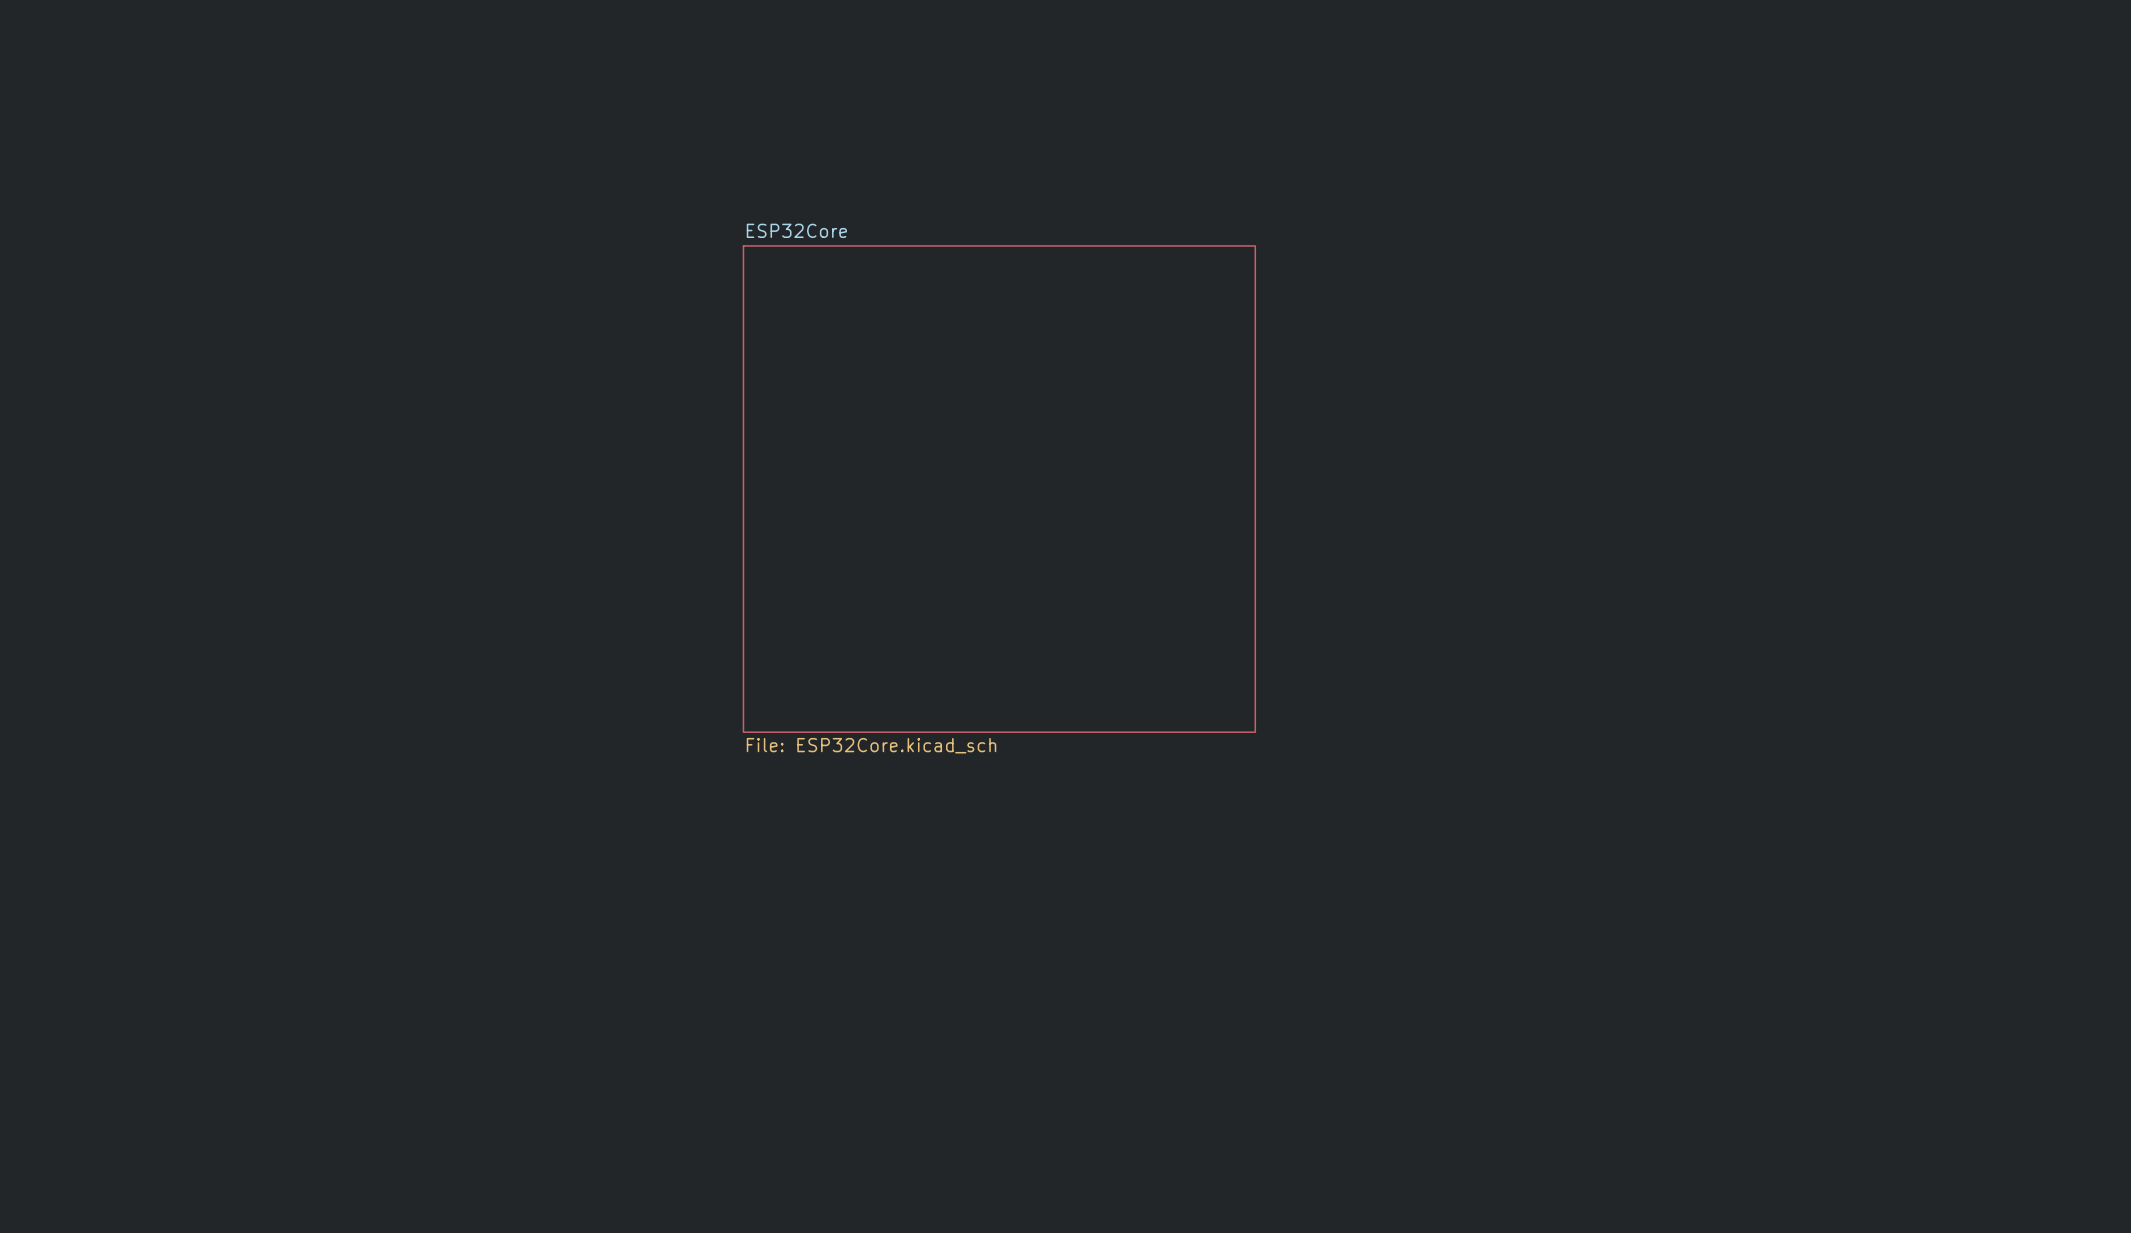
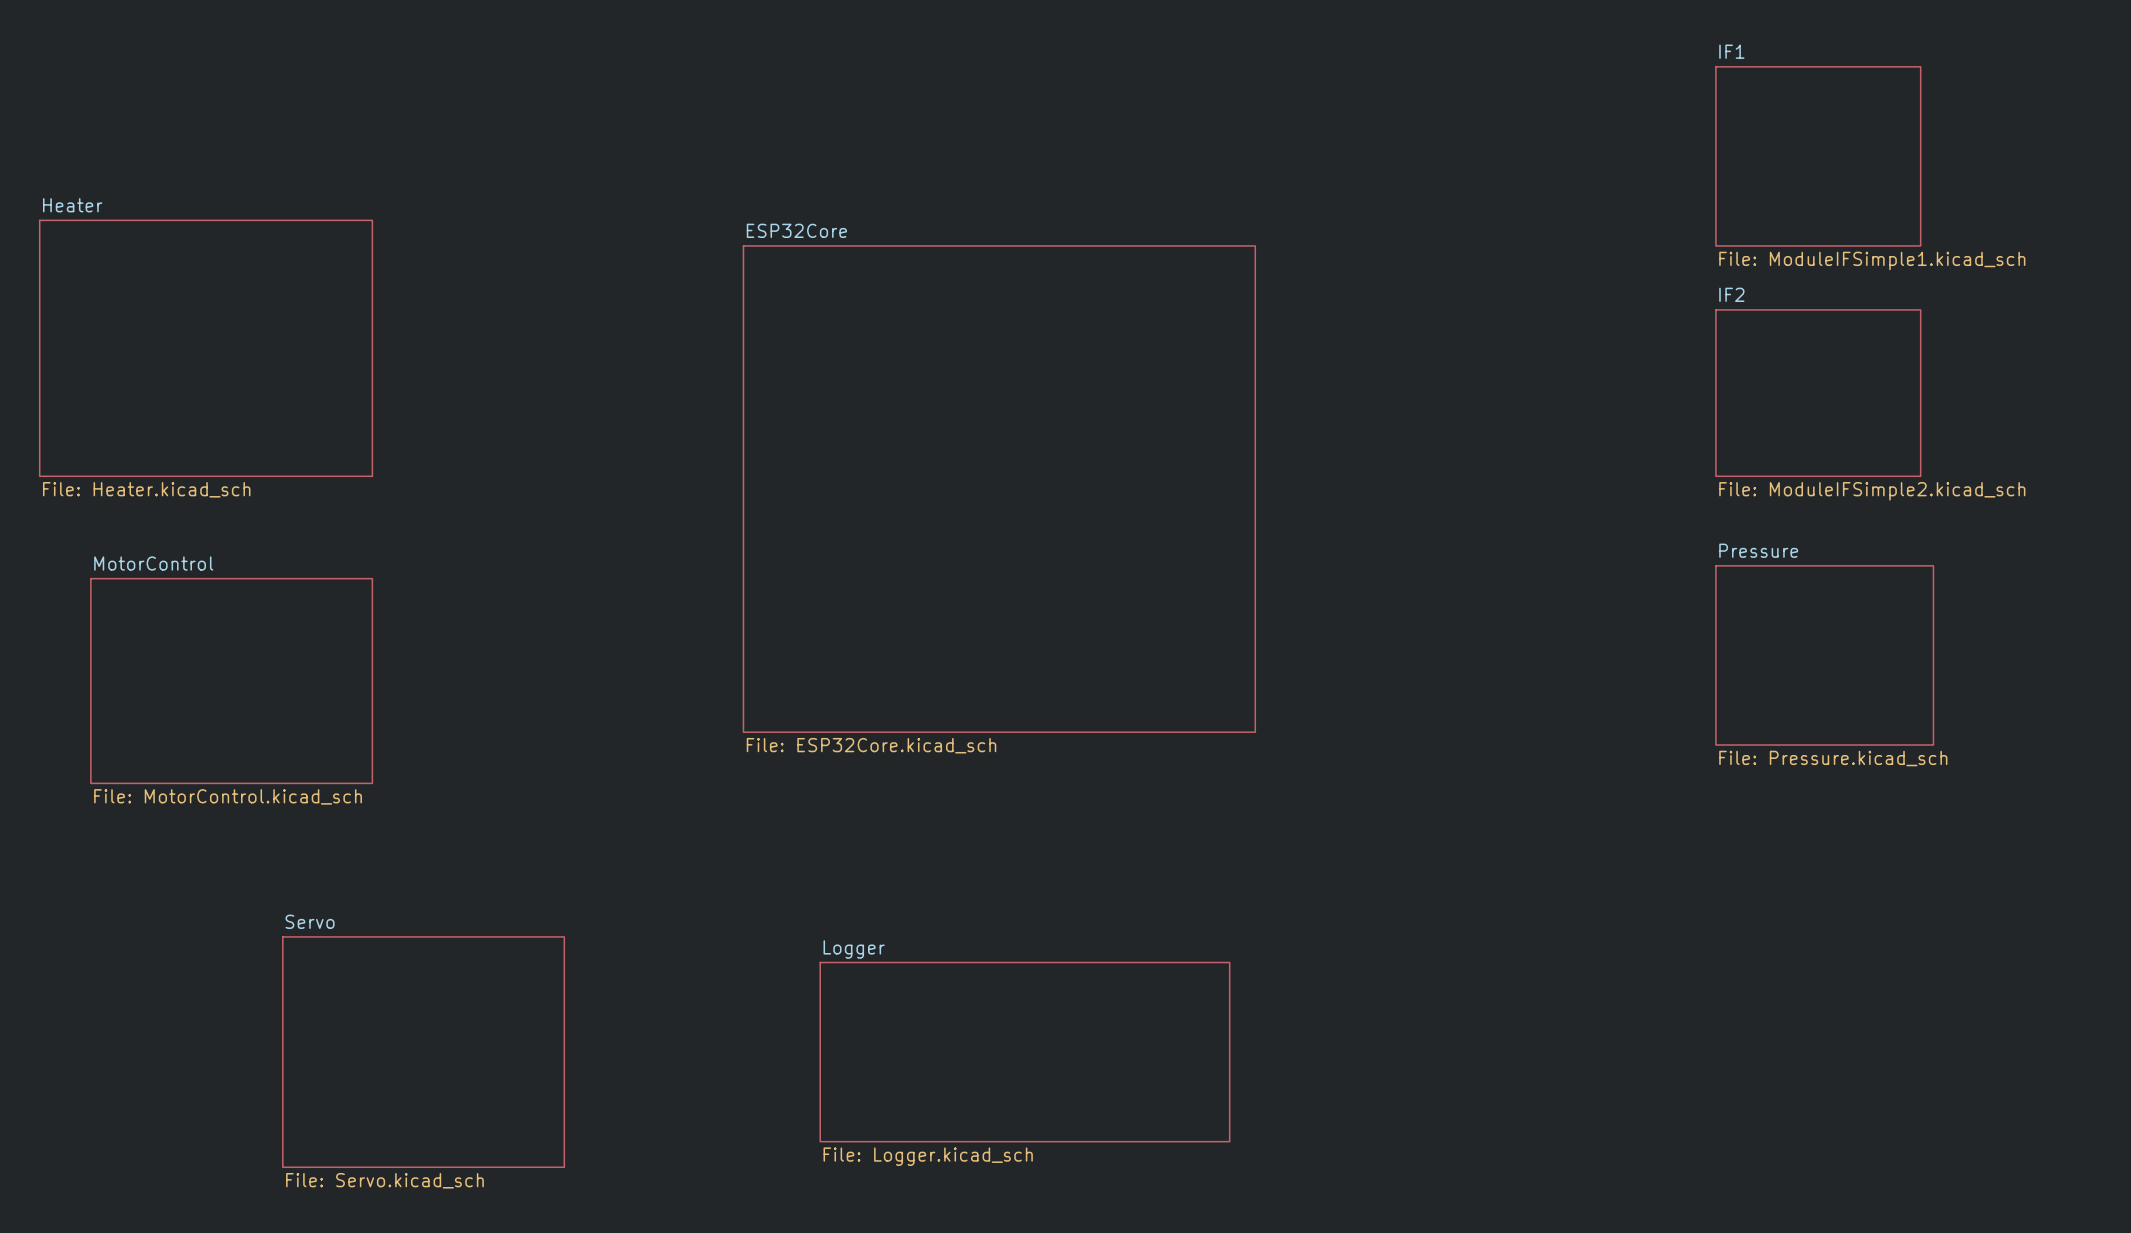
sheet IF1: none -> File: ModuleIFSimple1.kicad_sch (1818, 156)
sheet Heater: none -> File: Heater.kicad_sch (206, 348)
sheet IF2: none -> File: ModuleIFSimple2.kicad_sch (1818, 393)
sheet Pressure: none -> File: Pressure.kicad_sch (1824, 655)
sheet MotorControl: none -> File: MotorControl.kicad_sch (231, 681)
sheet Servo: none -> File: Servo.kicad_sch (423, 1052)
sheet Logger: none -> File: Logger.kicad_sch (1024, 1052)

